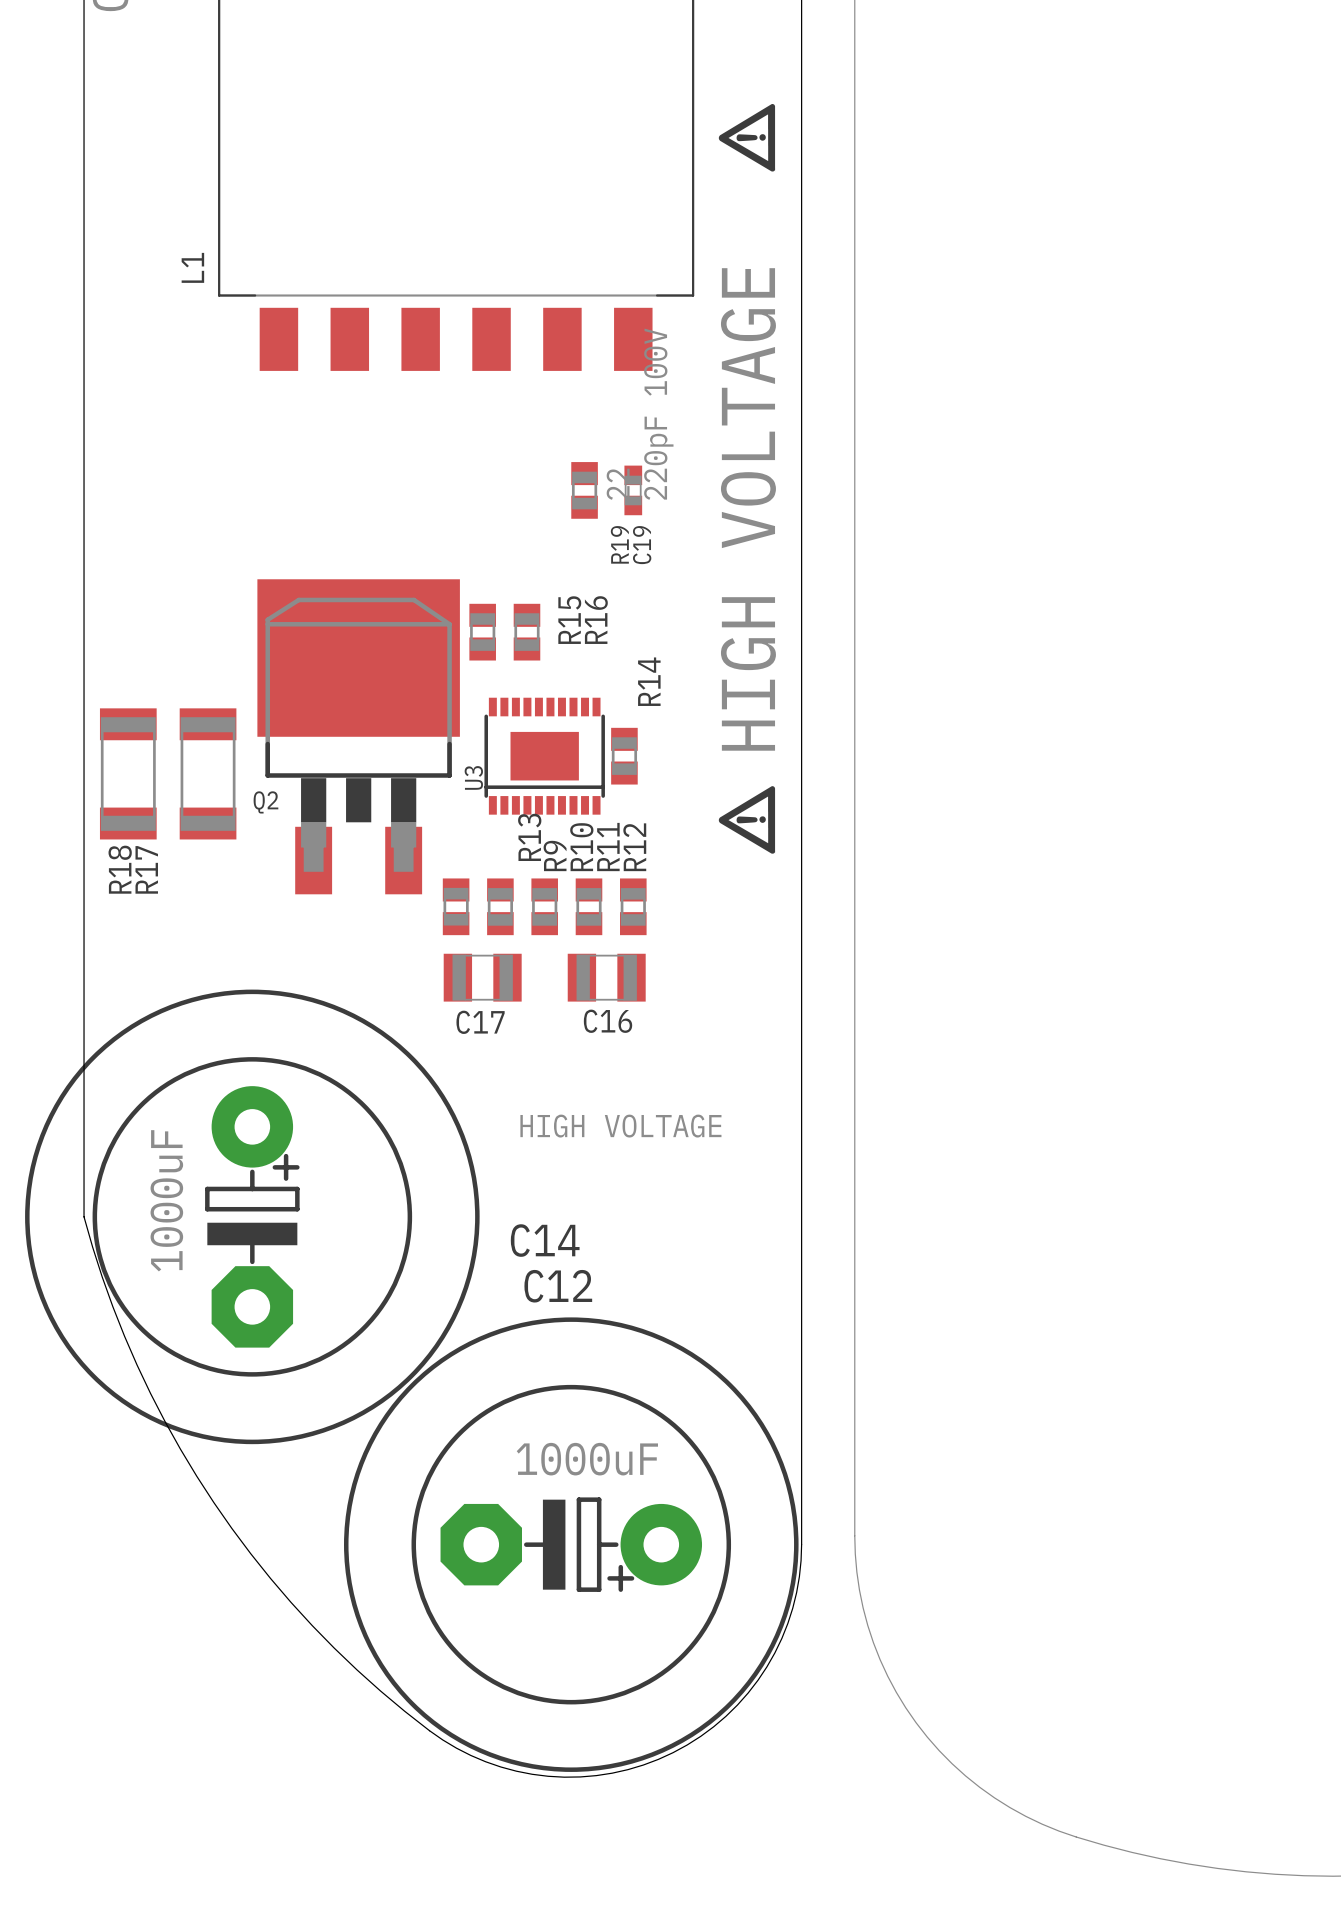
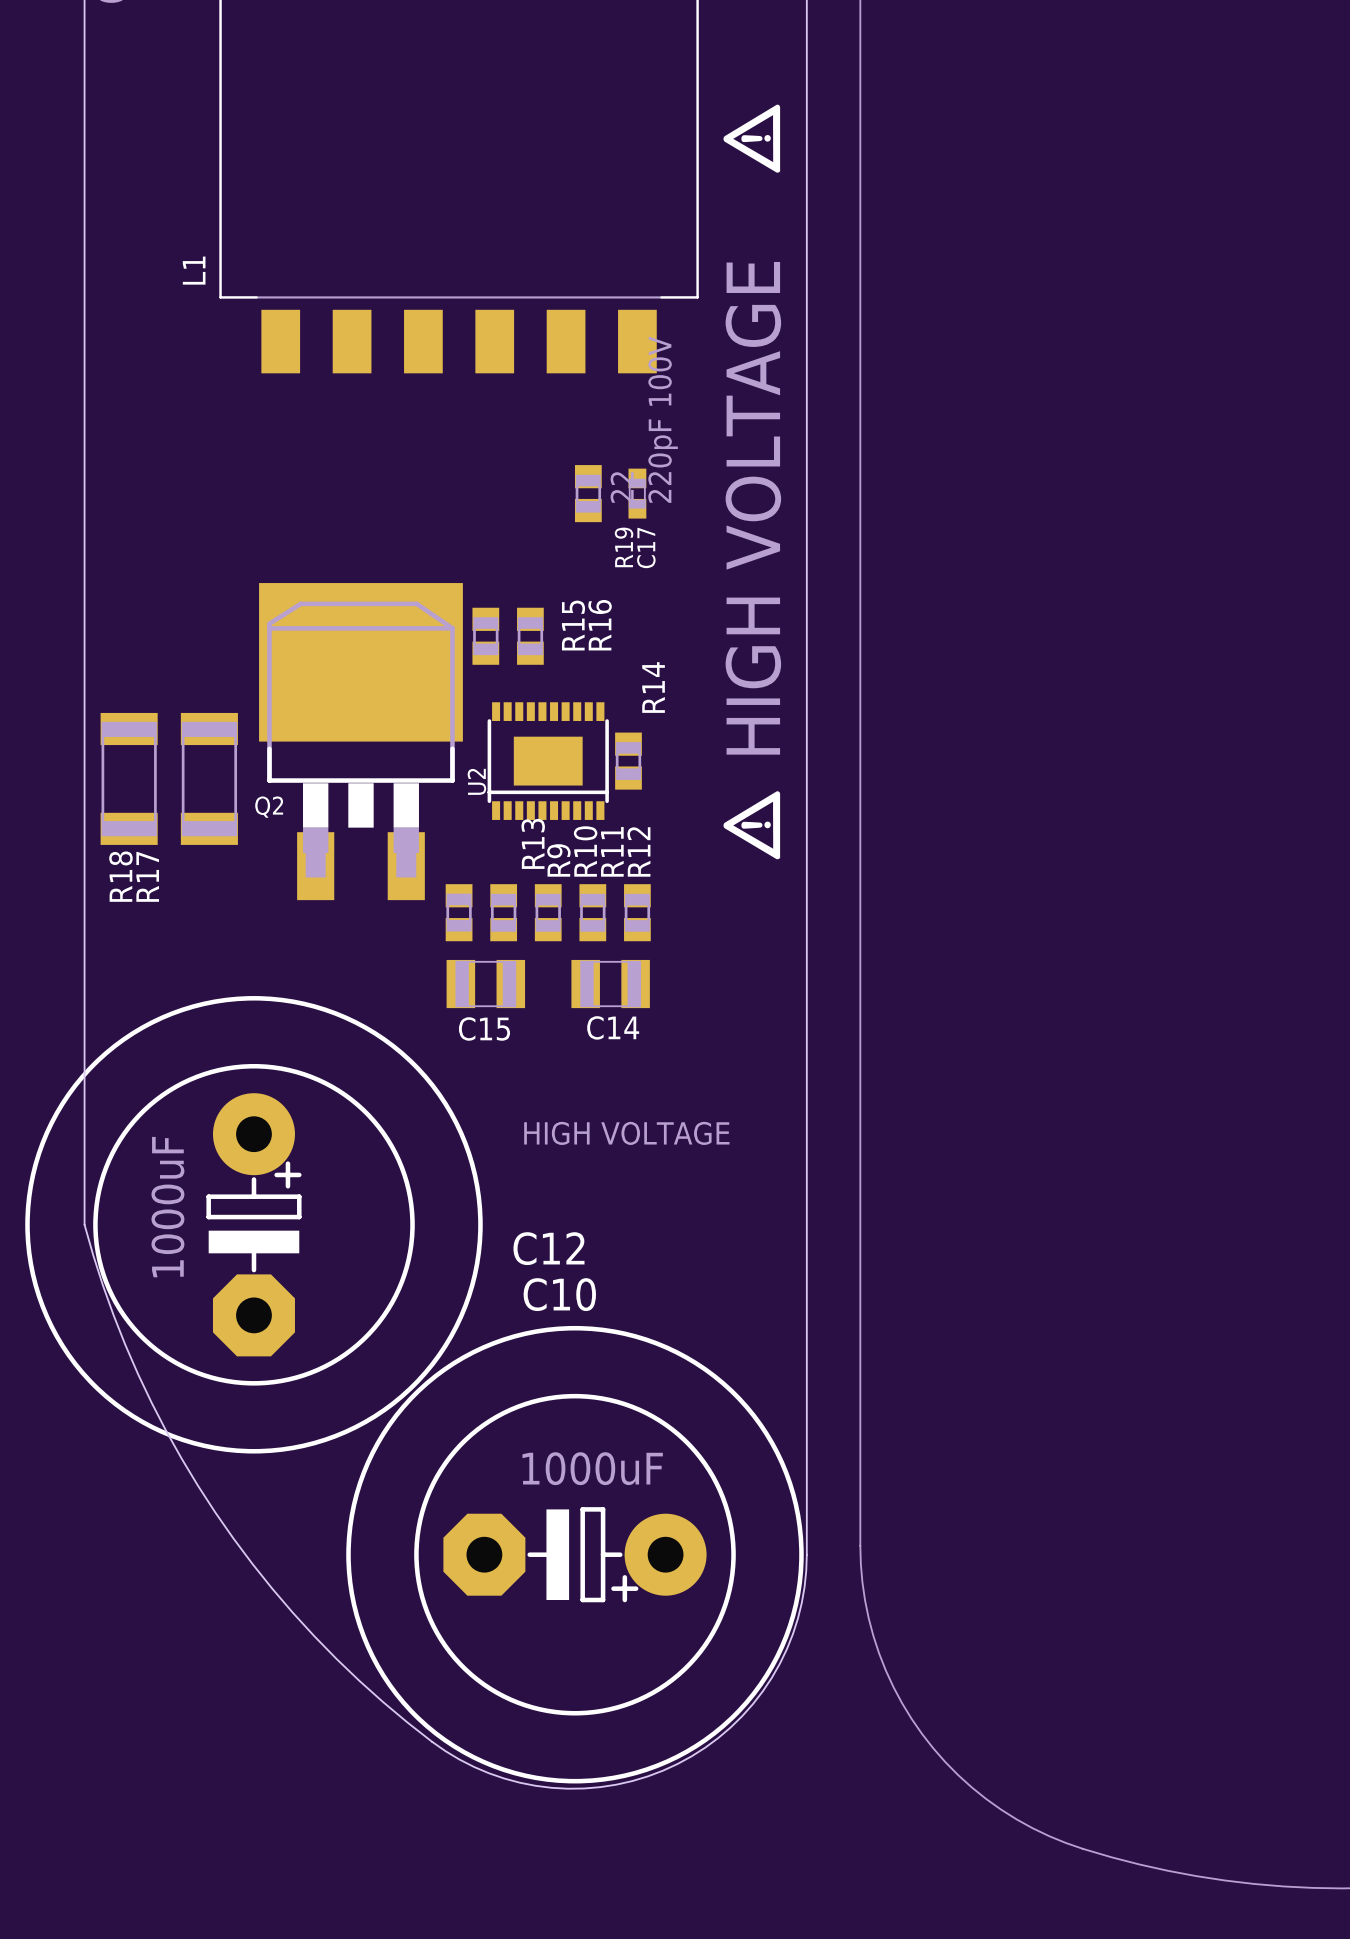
C19 name: C19 (642, 545) -> C17 (646, 548)
U3 name: U3 (473, 777) -> U2 (476, 781)
C16 name: C16 (608, 1021) -> C14 (613, 1027)
C17 name: C17 (480, 1022) -> C15 (484, 1028)
C14 name: C14 (545, 1240) -> C12 (548, 1248)
C12 name: C12 (558, 1286) -> C10 (559, 1294)

